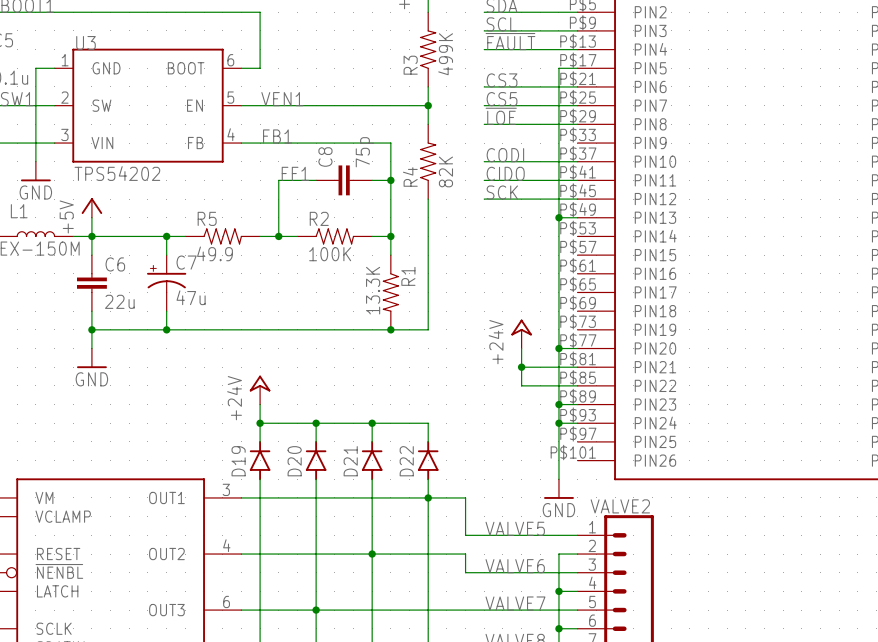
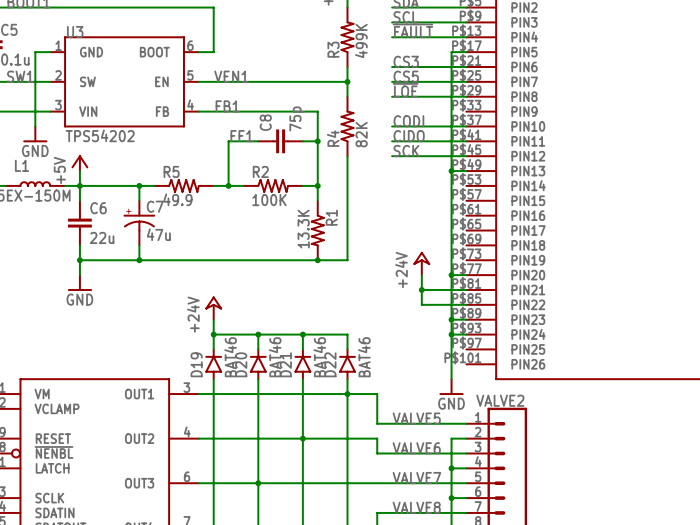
D19 value: none -> BAT46 (230, 357)
D20 value: none -> BAT46 (275, 357)
D21 value: none -> BAT46 (319, 357)
D22 value: none -> BAT46 (364, 357)

